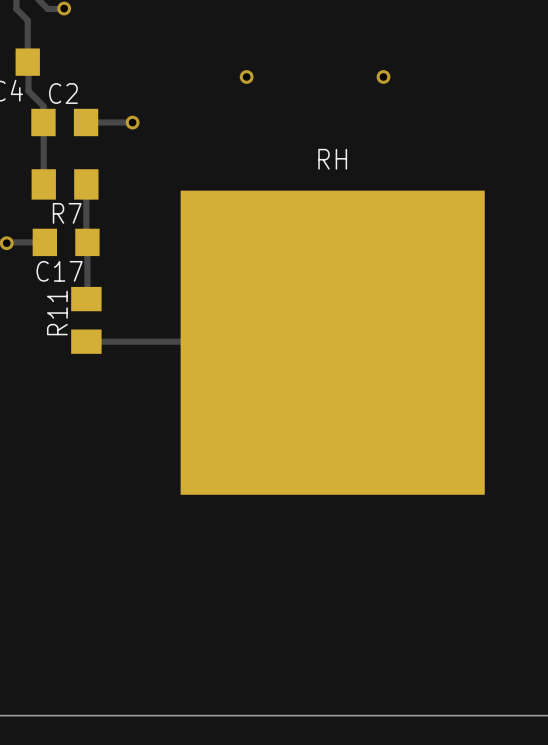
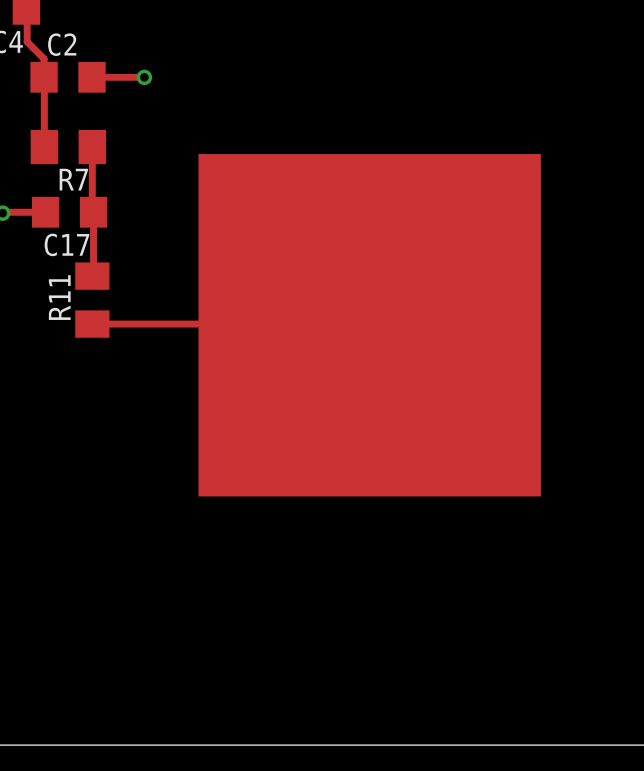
via: (246, 76) -> none
via: (383, 76) -> none
RH name: RH (332, 159) -> none

